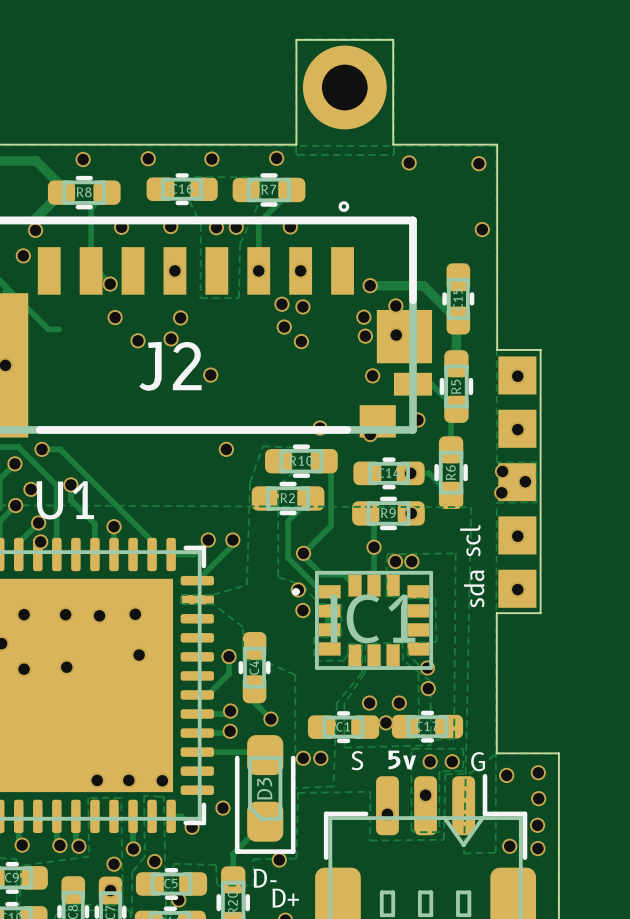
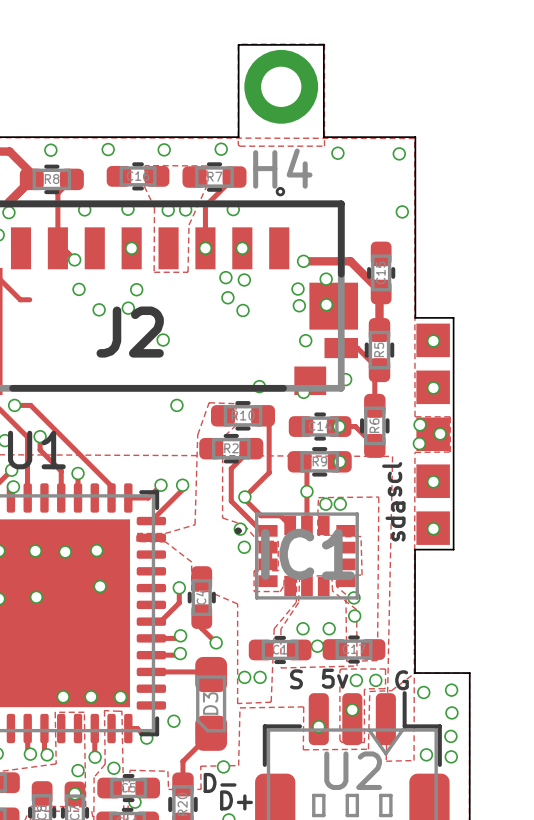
H4 name: none -> H4 (282, 168)
D3 footprint: [234, 735, 296, 854] -> [195, 656, 228, 751]
U2 name: none -> U2 (353, 770)

